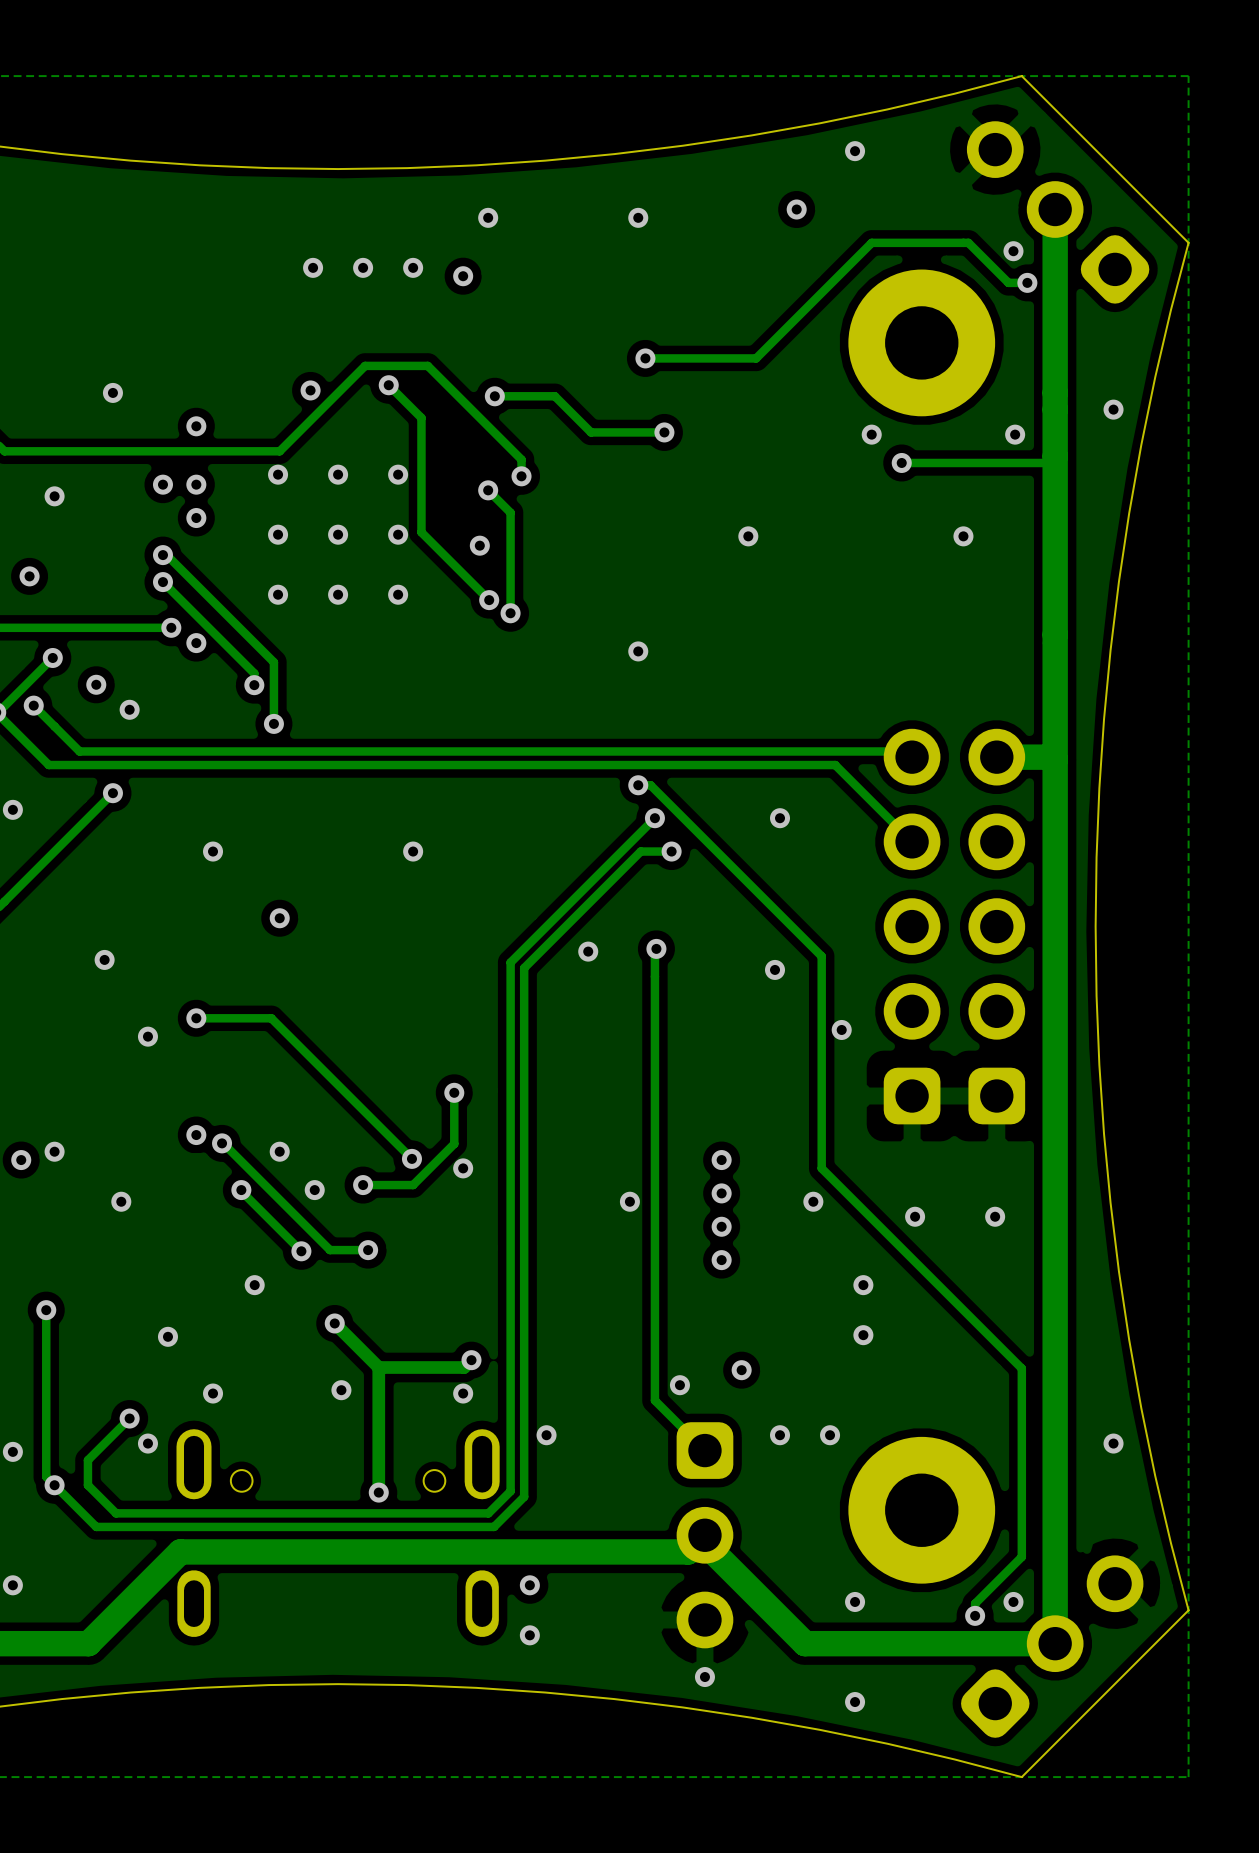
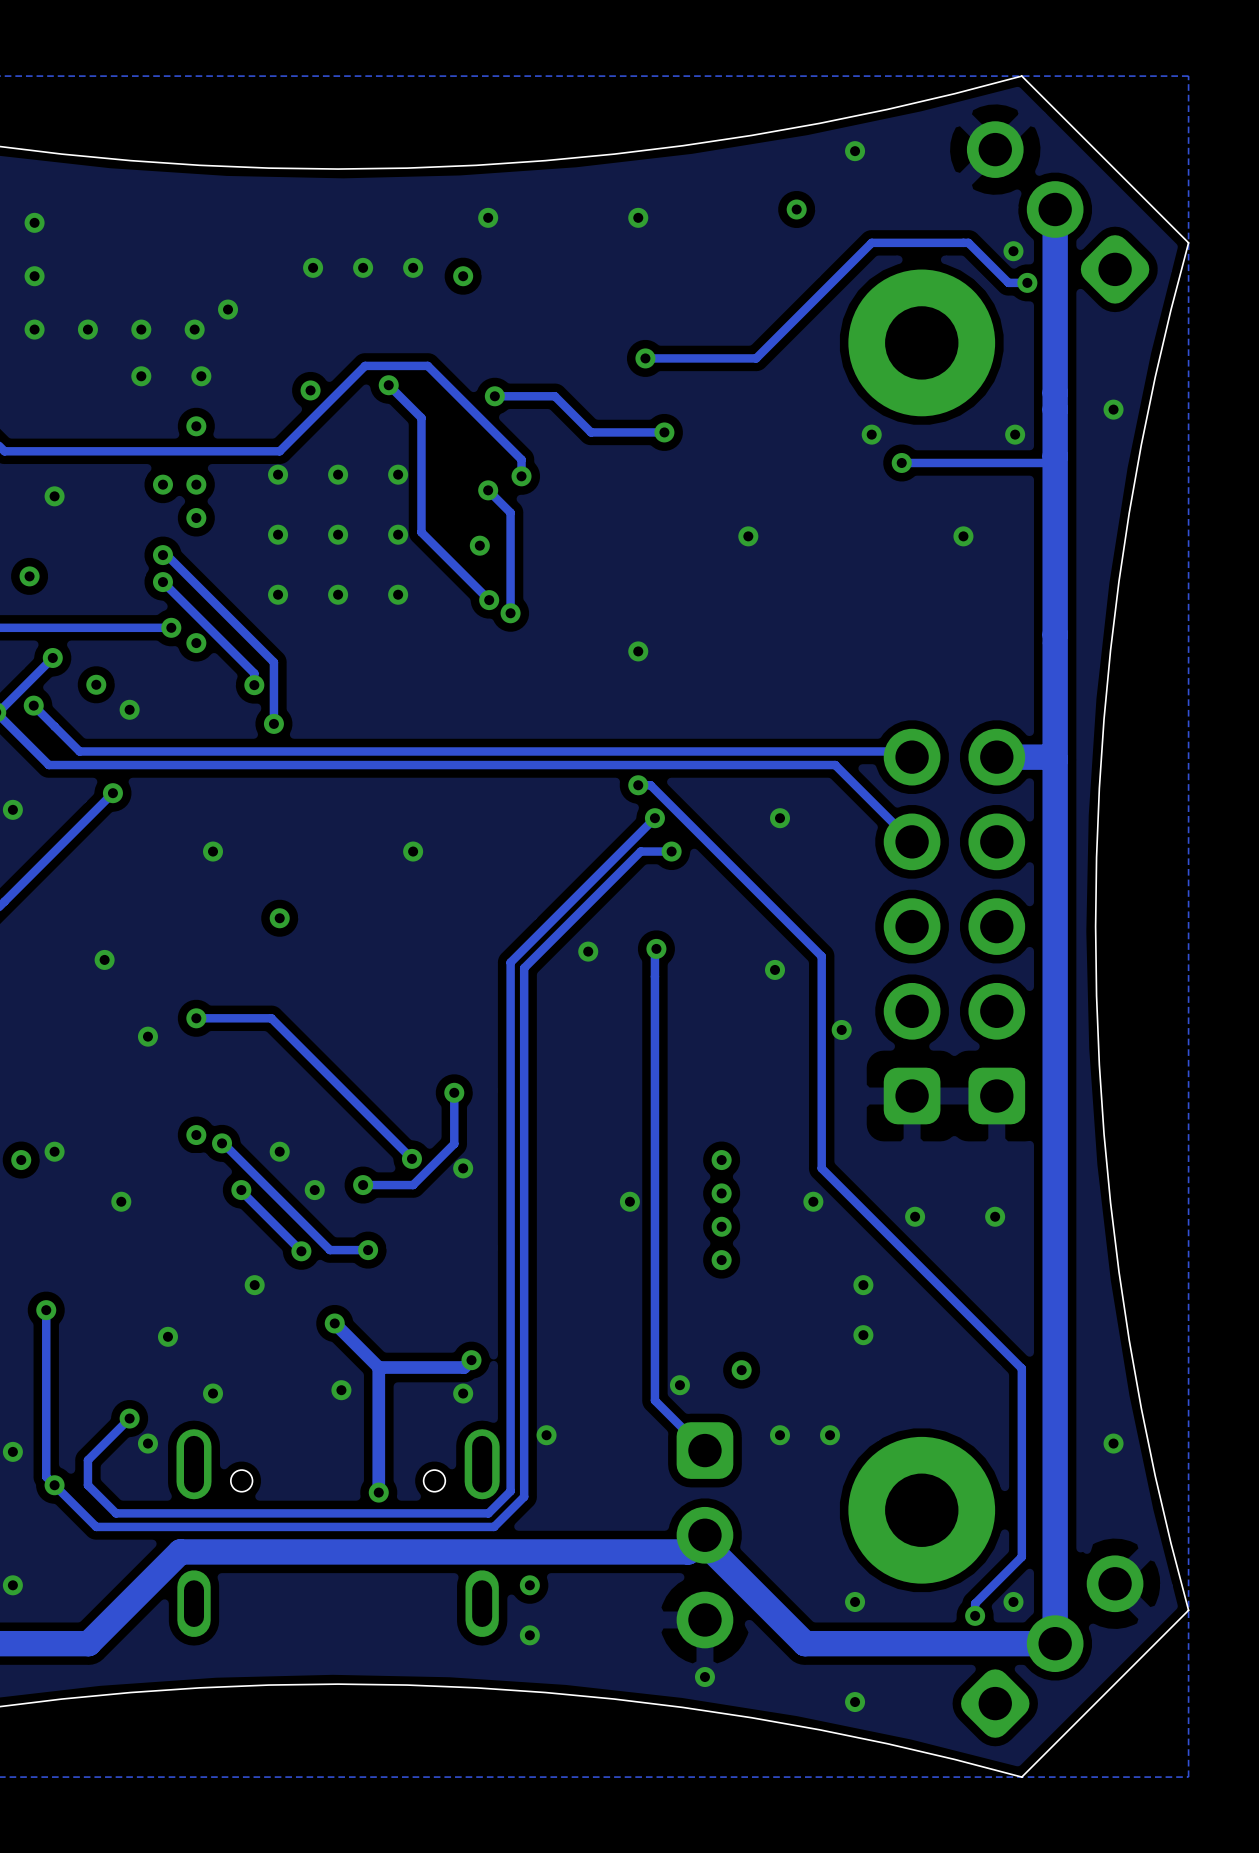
via: none -> (34, 222)
via: none -> (34, 276)
via: none -> (228, 309)
via: none -> (34, 329)
via: none -> (87, 329)
via: none -> (141, 329)
via: none -> (194, 329)
via: none -> (201, 376)
via position: (112, 392) -> (141, 376)

